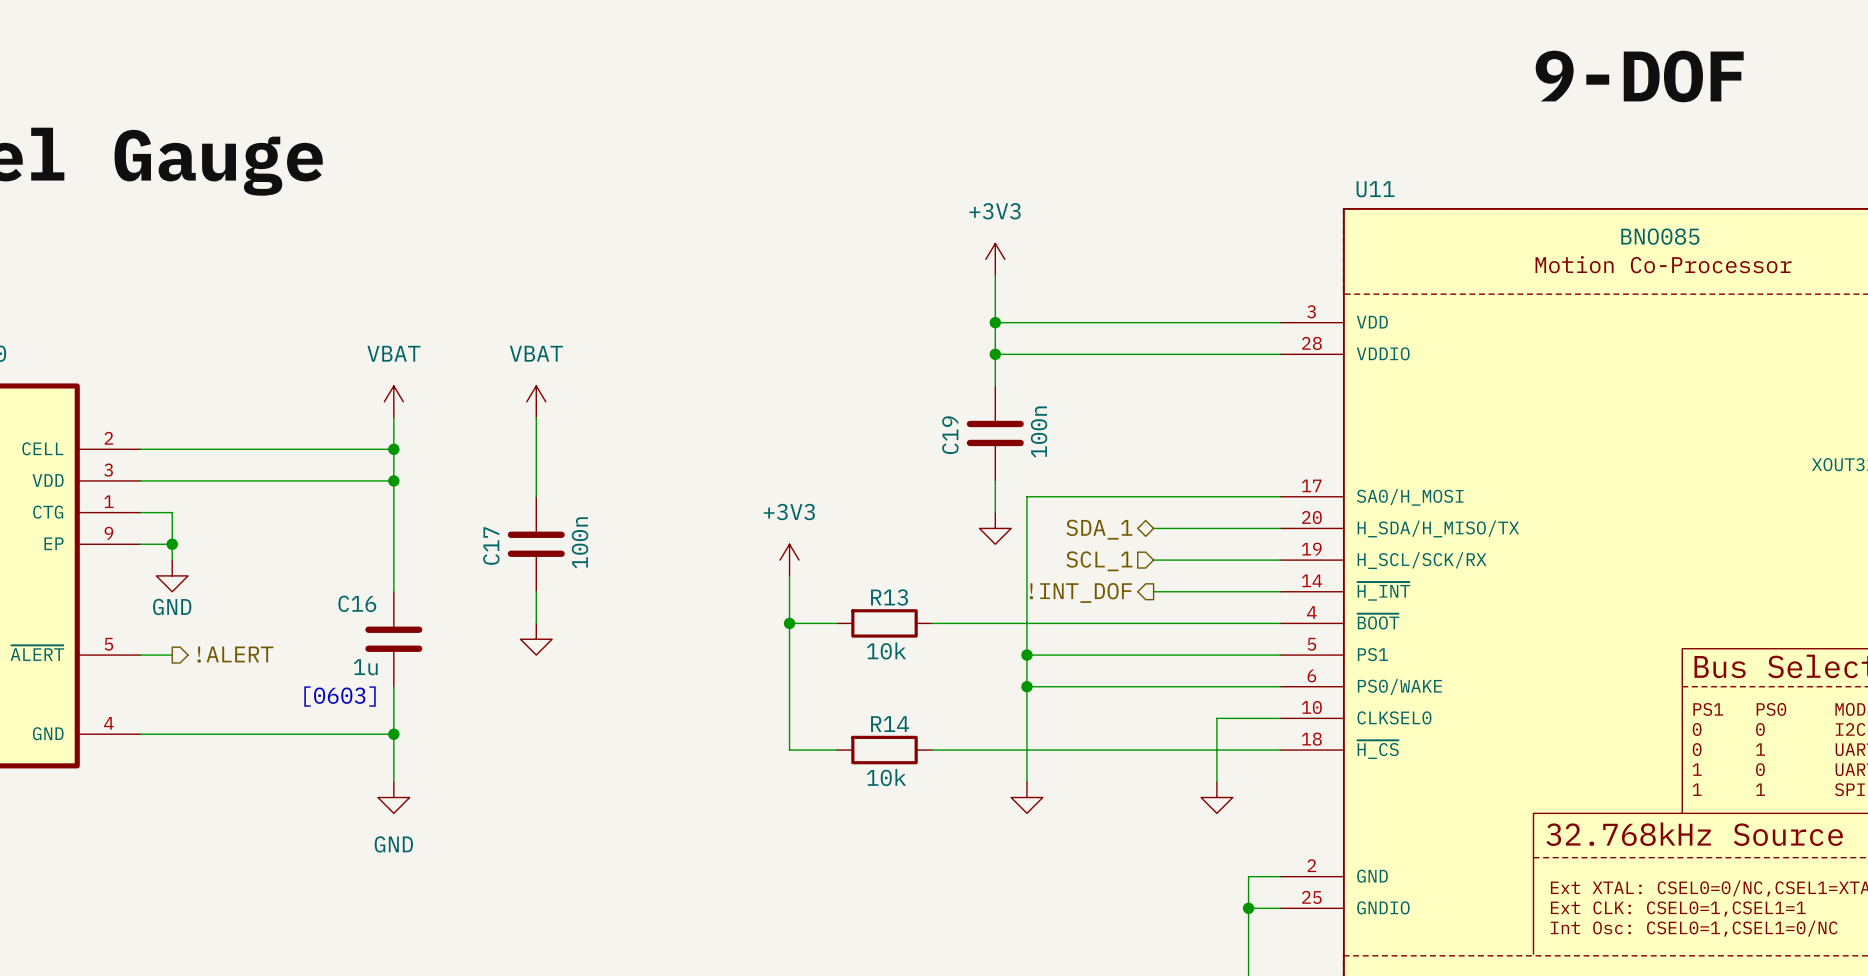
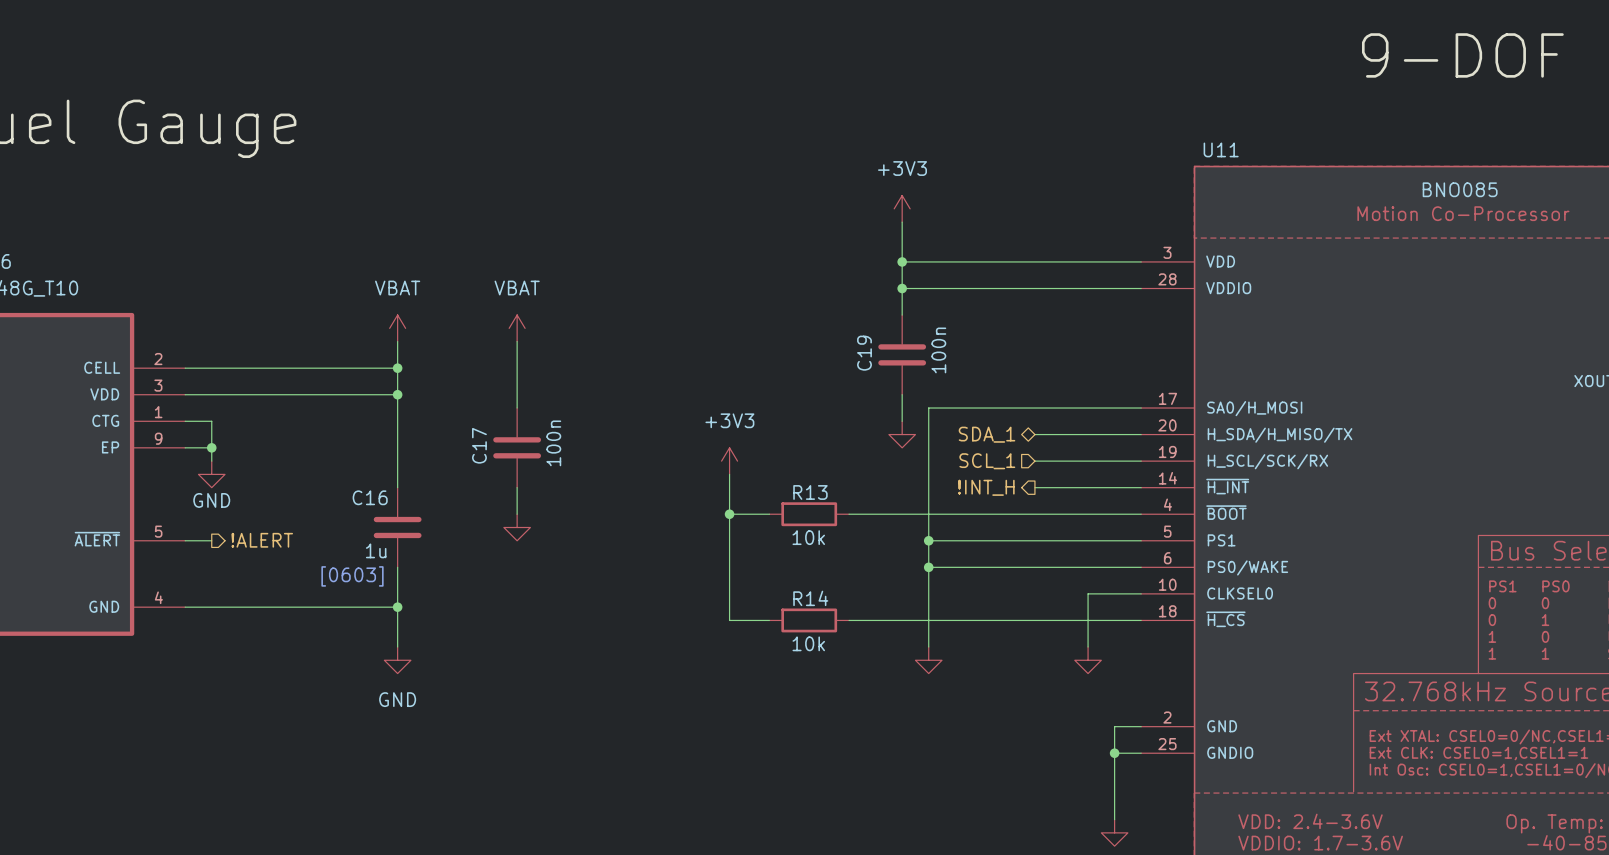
hierarchical label: !INT_DOF (1080, 592) -> !INT_H (986, 487)

